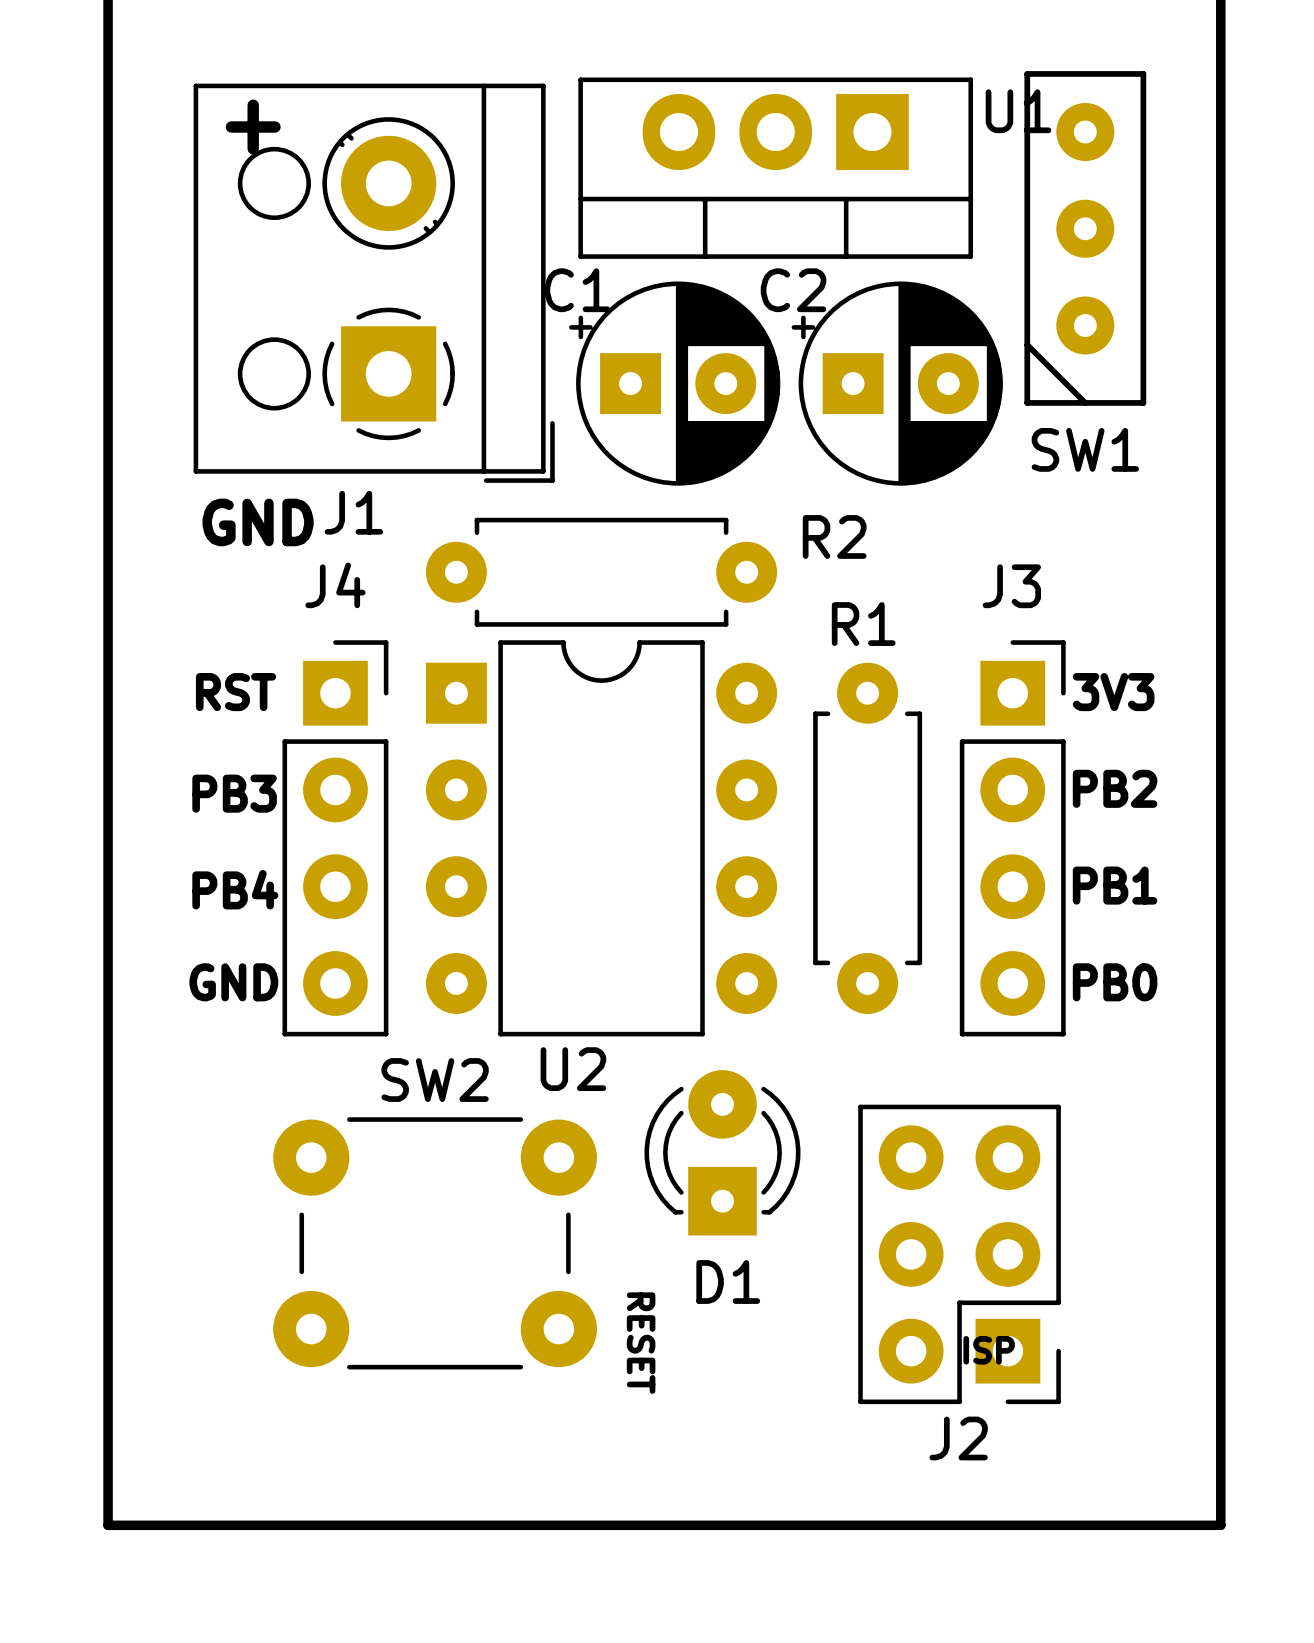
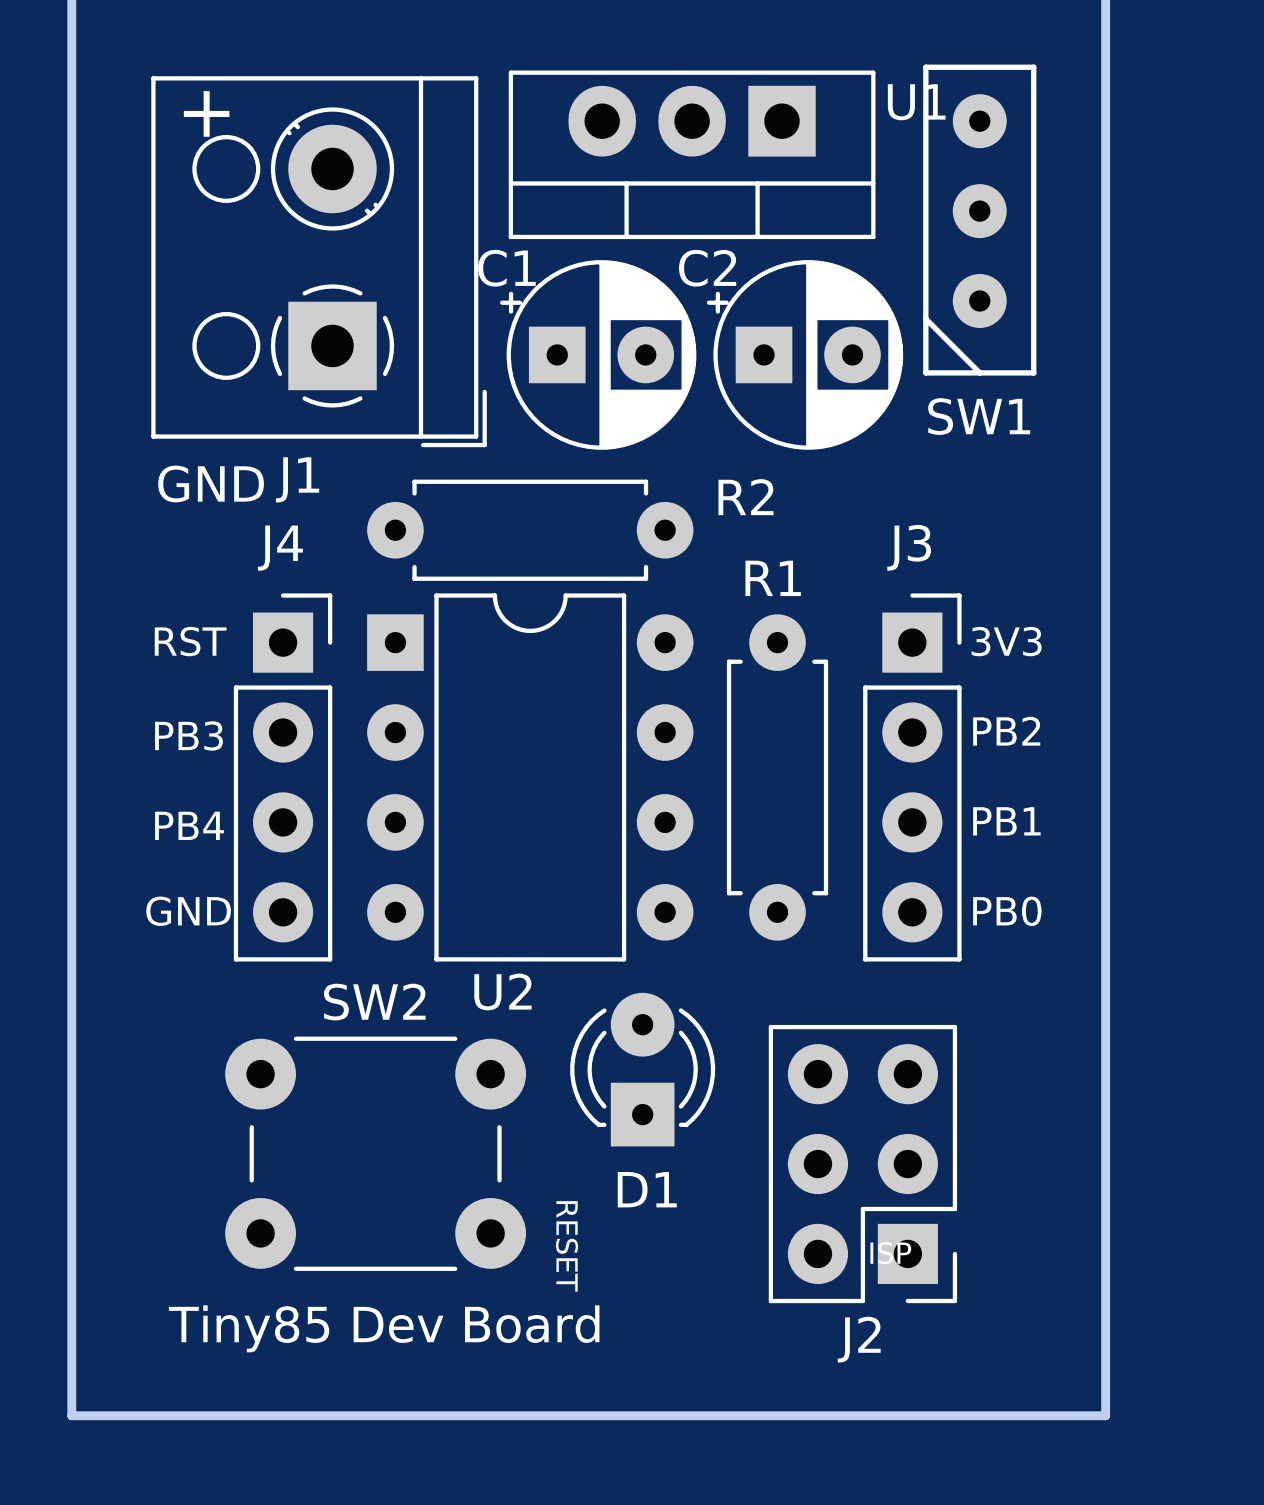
text: none -> Tiny85 Dev Board (384, 1328)

